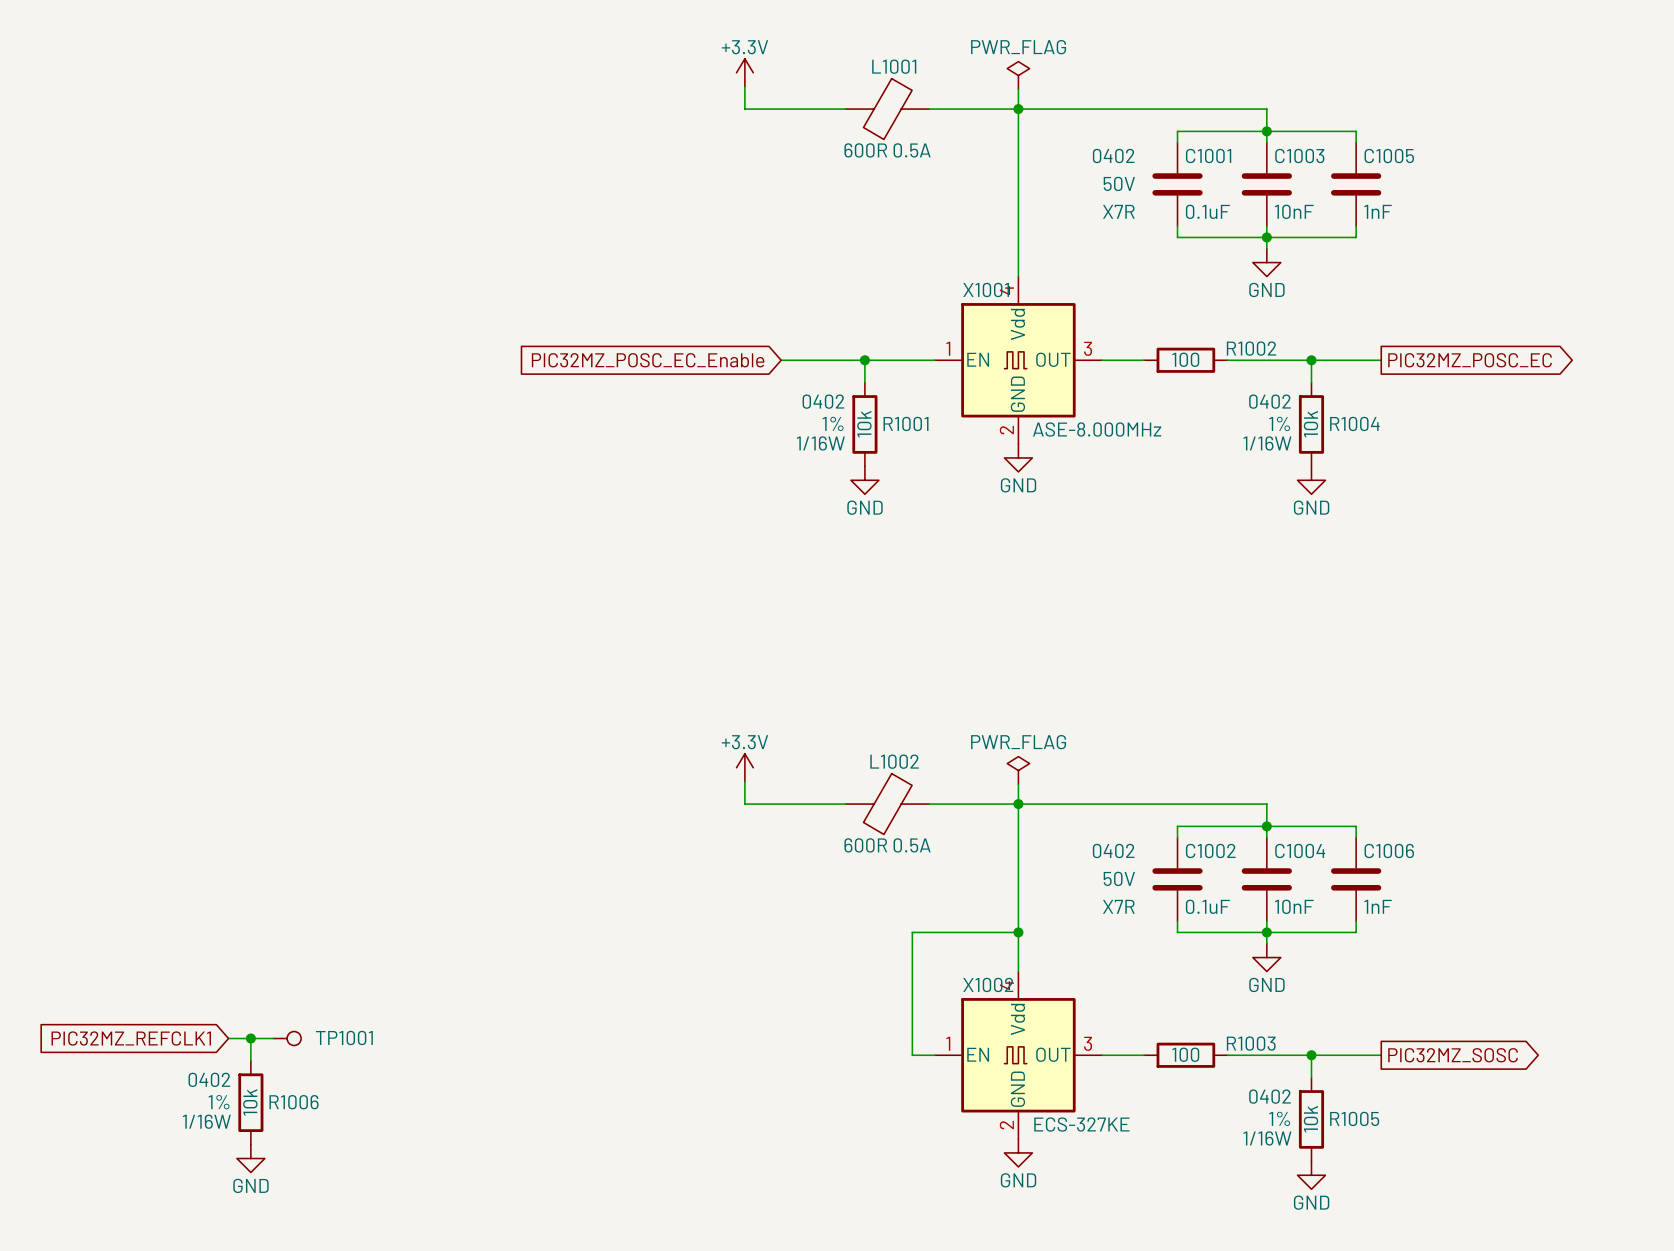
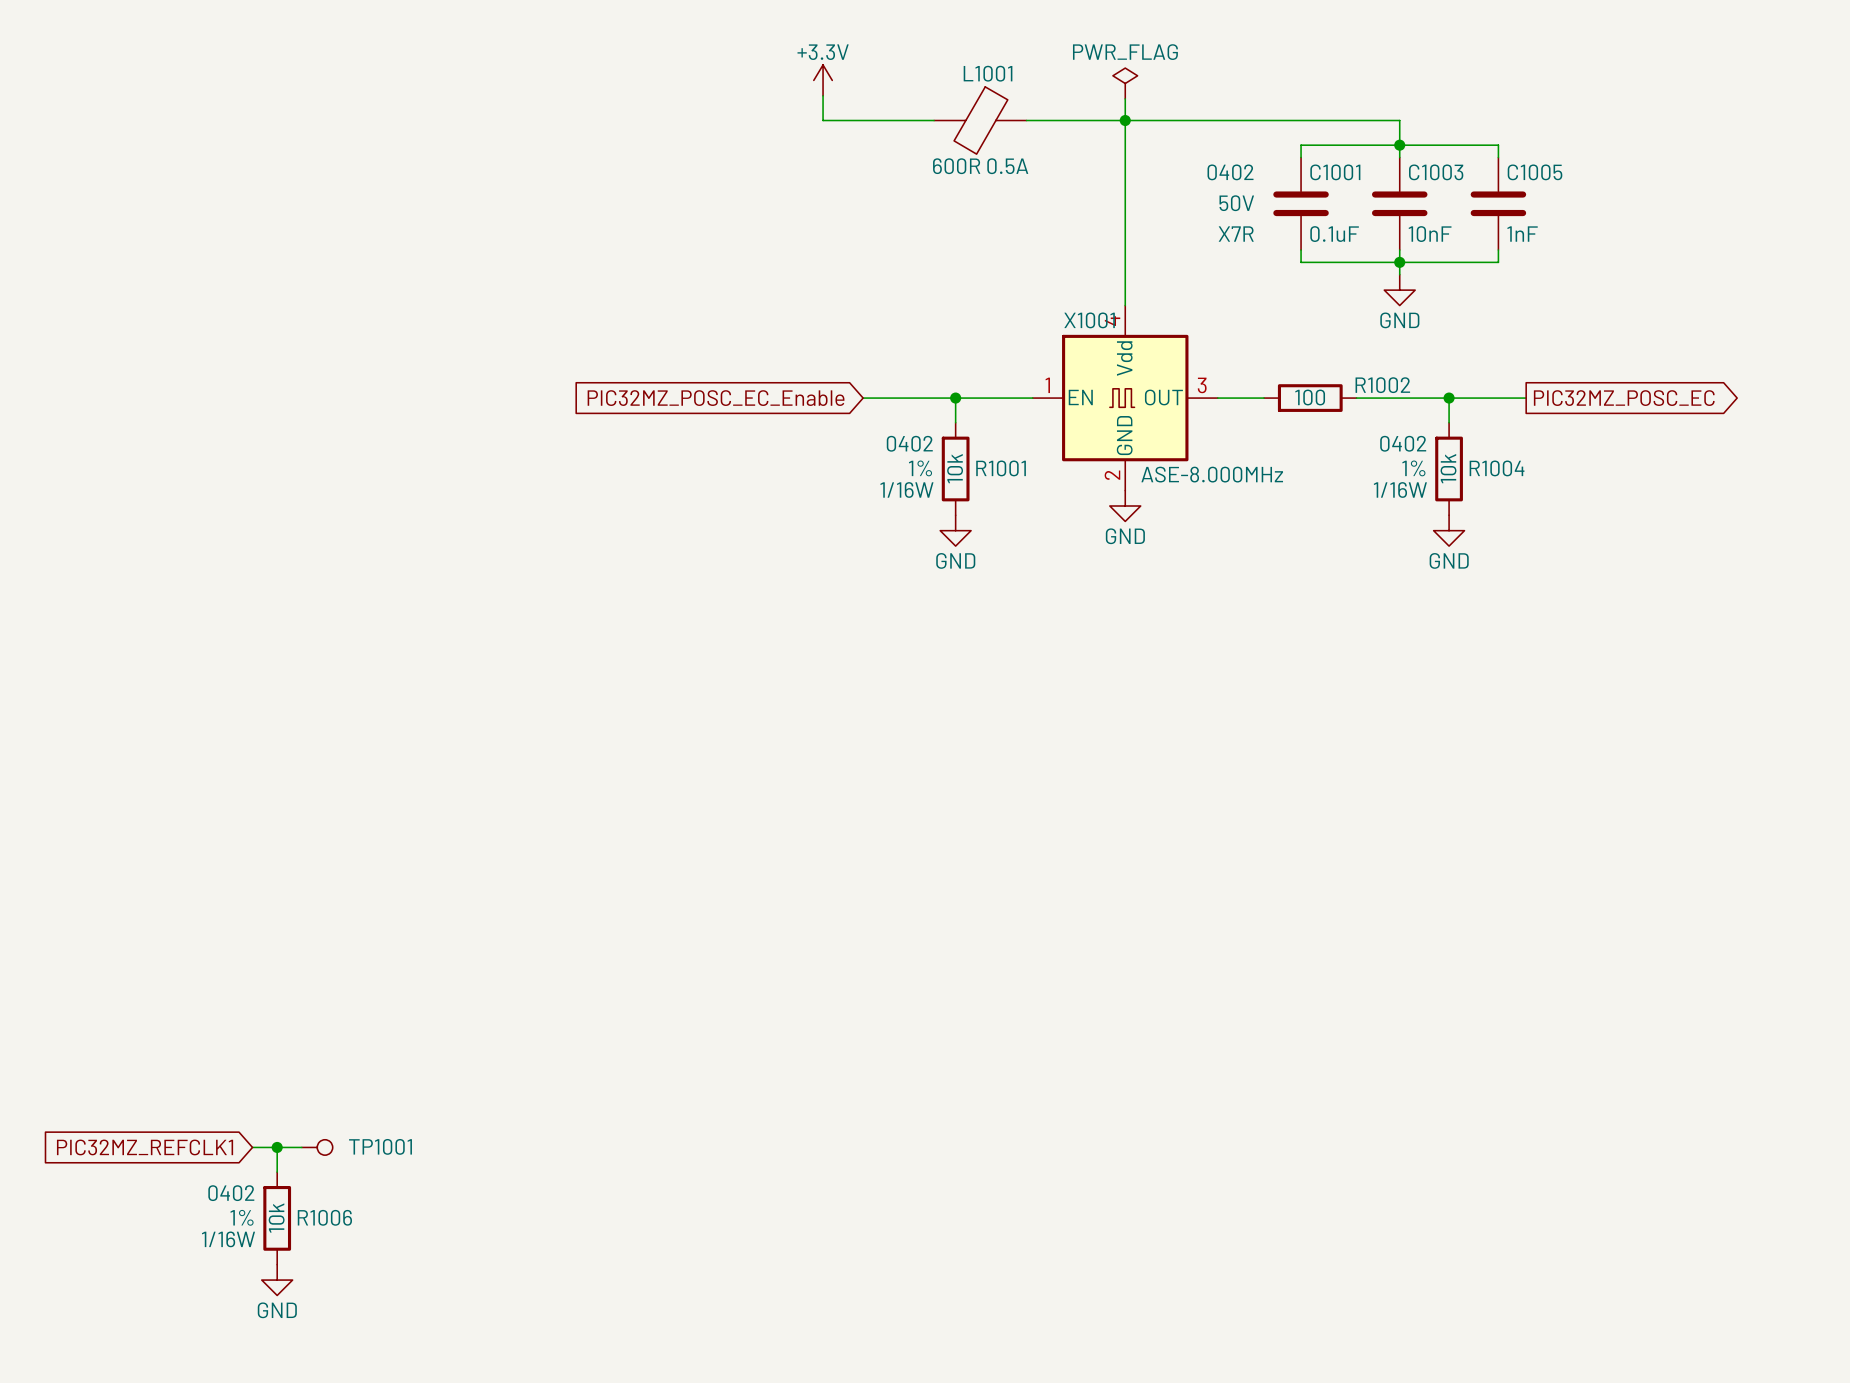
power symbol: +3.3V (744, 767) -> none
power symbol: PWR_FLAG (1018, 770) -> none
wire: (744, 781) (744, 804) (845, 804) -> none
wire: (1018, 784) (1018, 971) -> none
L1002: 600R 0.5A (887, 804) -> none
wire: (929, 804) (1266, 804) (1266, 837) -> none
junction: (1018, 804) -> none
junction: (1266, 826) -> none
wire: (1177, 837) (1177, 826) (1356, 826) (1356, 837) -> none
C1002: 0.1uF (1177, 879) -> none
C1004: 10nF (1266, 879) -> none
C1006: 1nF (1356, 879) -> none
wire: (1177, 921) (1177, 932) (1356, 932) (1356, 921) -> none
wire: (1266, 921) (1266, 943) -> none
wire: (1018, 932) (912, 932) (912, 1055) (934, 1055) -> none
junction: (1018, 932) -> none
junction: (1266, 932) -> none
power symbol: GND (1266, 957) -> none
X1002: ECS-327KE (1018, 1055) -> none
wire: (1102, 1055) (1144, 1055) -> none
R1003: 100 (1185, 1055) -> none
wire: (1227, 1055) (1381, 1055) -> none
wire: (1311, 1055) (1311, 1077) -> none
junction: (1311, 1055) -> none
global label: PIC32MZ_SOSC (1453, 1055) -> none
R1005: 10k (1311, 1119) -> none
power symbol: GND (1018, 1152) -> none
power symbol: GND (1311, 1175) -> none

